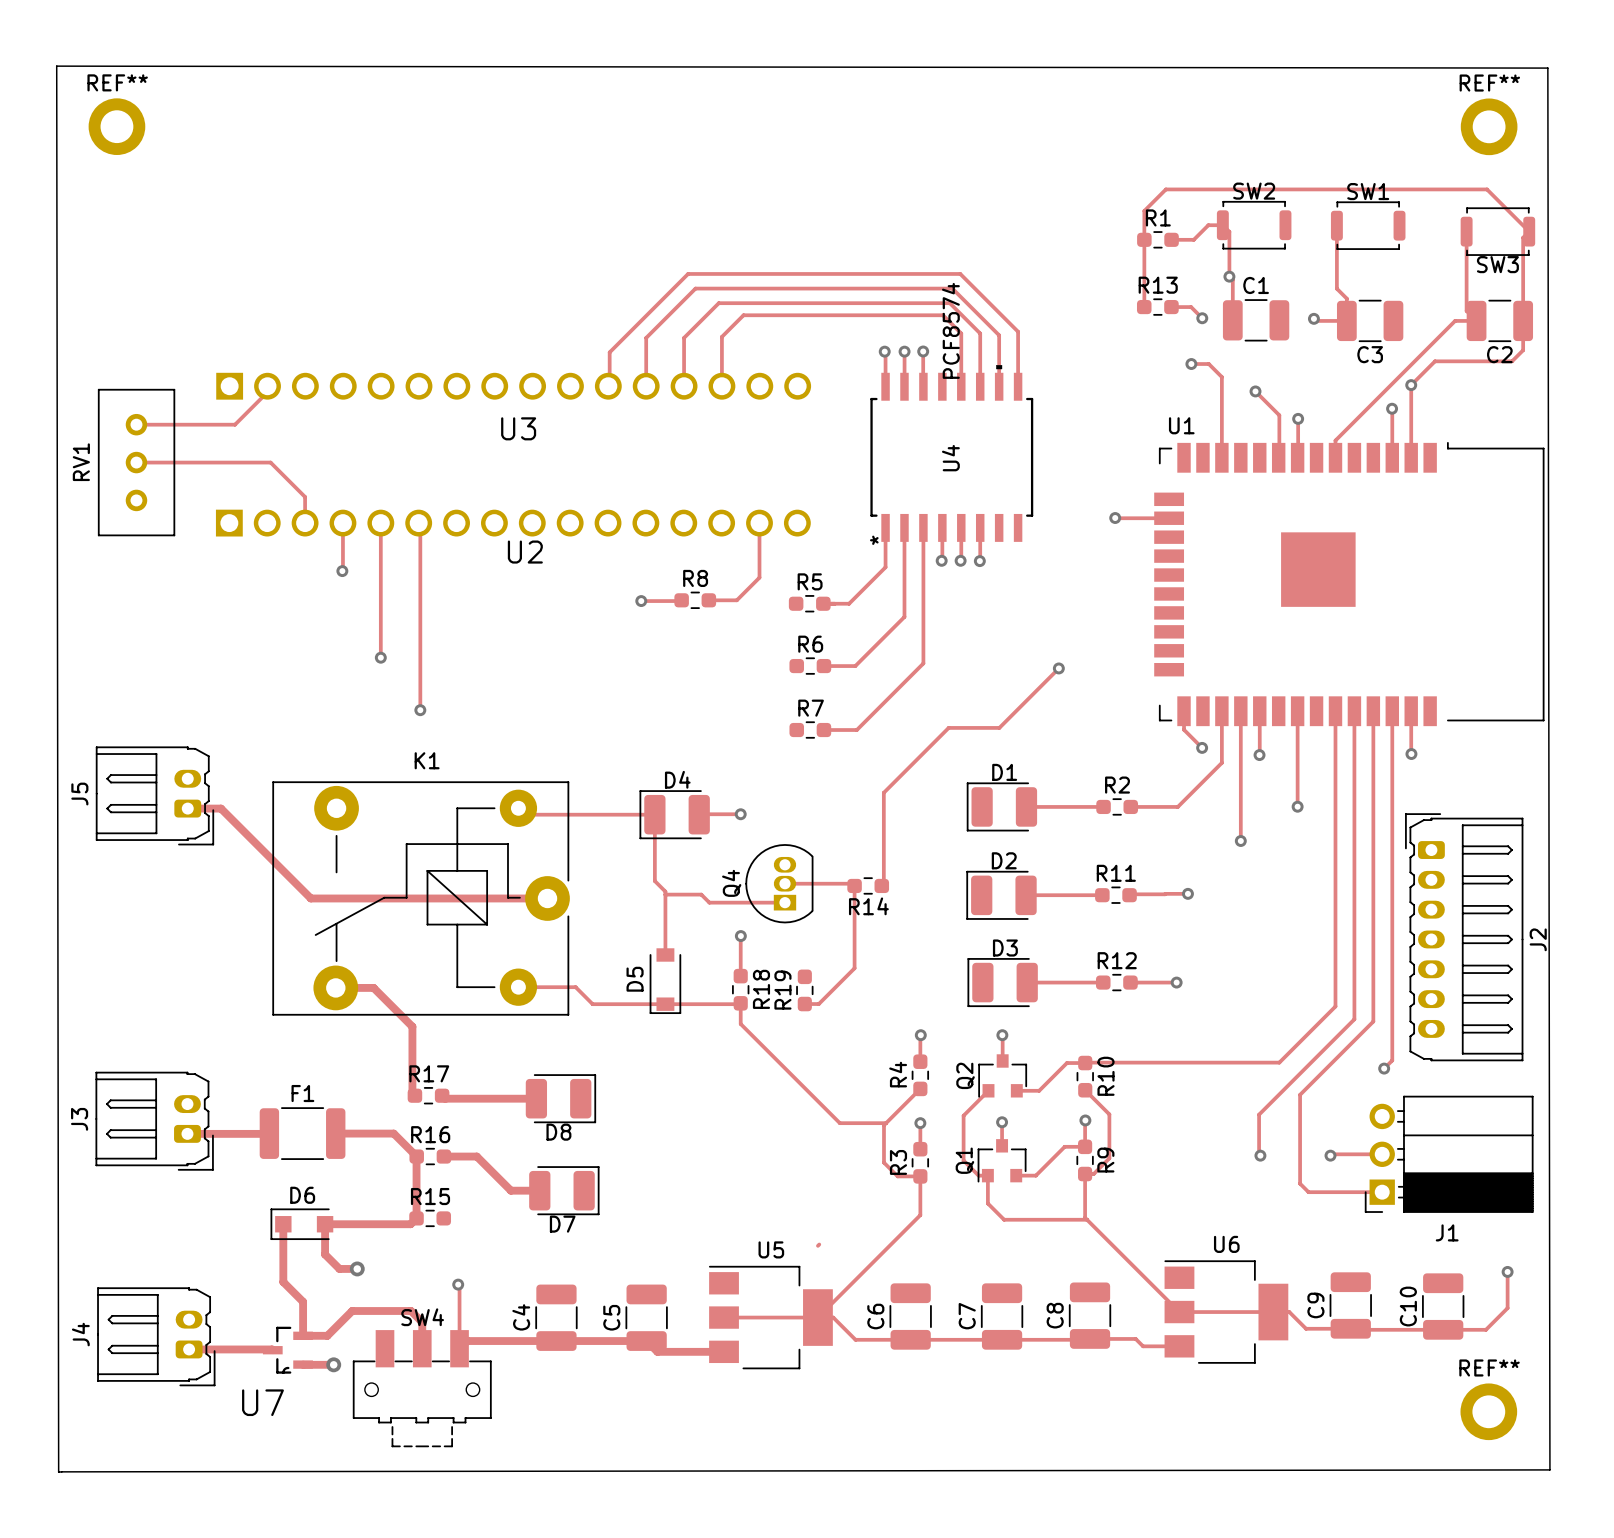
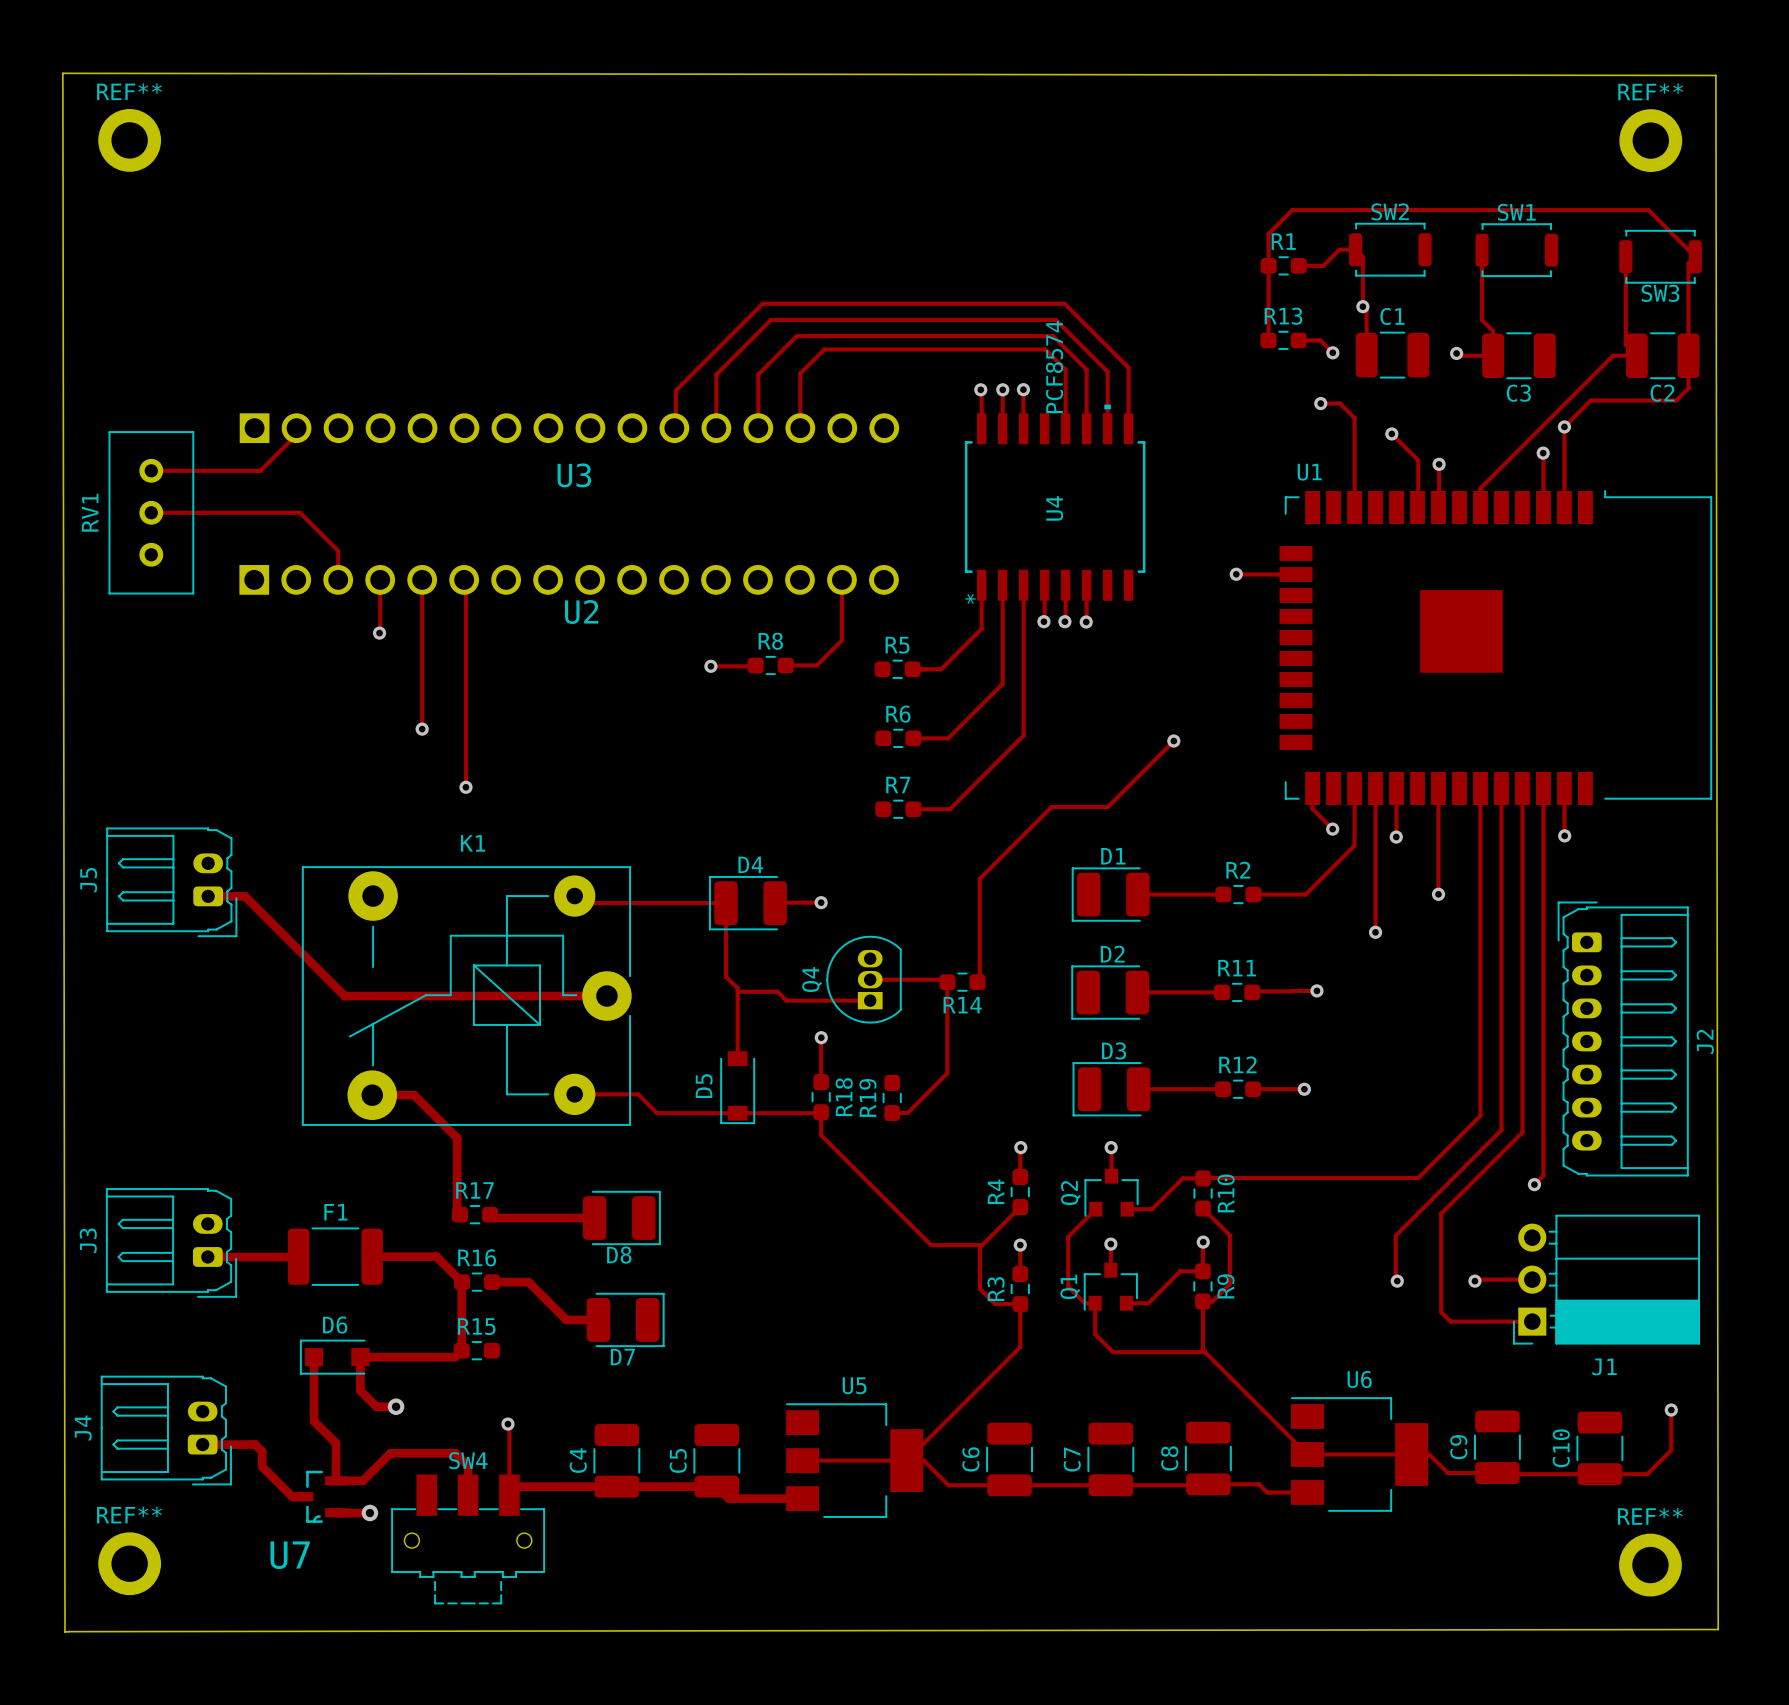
track: (819, 1244) (817, 1245) -> none
track: none -> (202, 1444) (255, 1444) (262, 1451) (262, 1466) (292, 1496) (302, 1496)
J4 position: (156, 1336) -> (166, 1430)
track: (189, 1349) (272, 1349) -> none
REF**: none -> (129, 1563)

